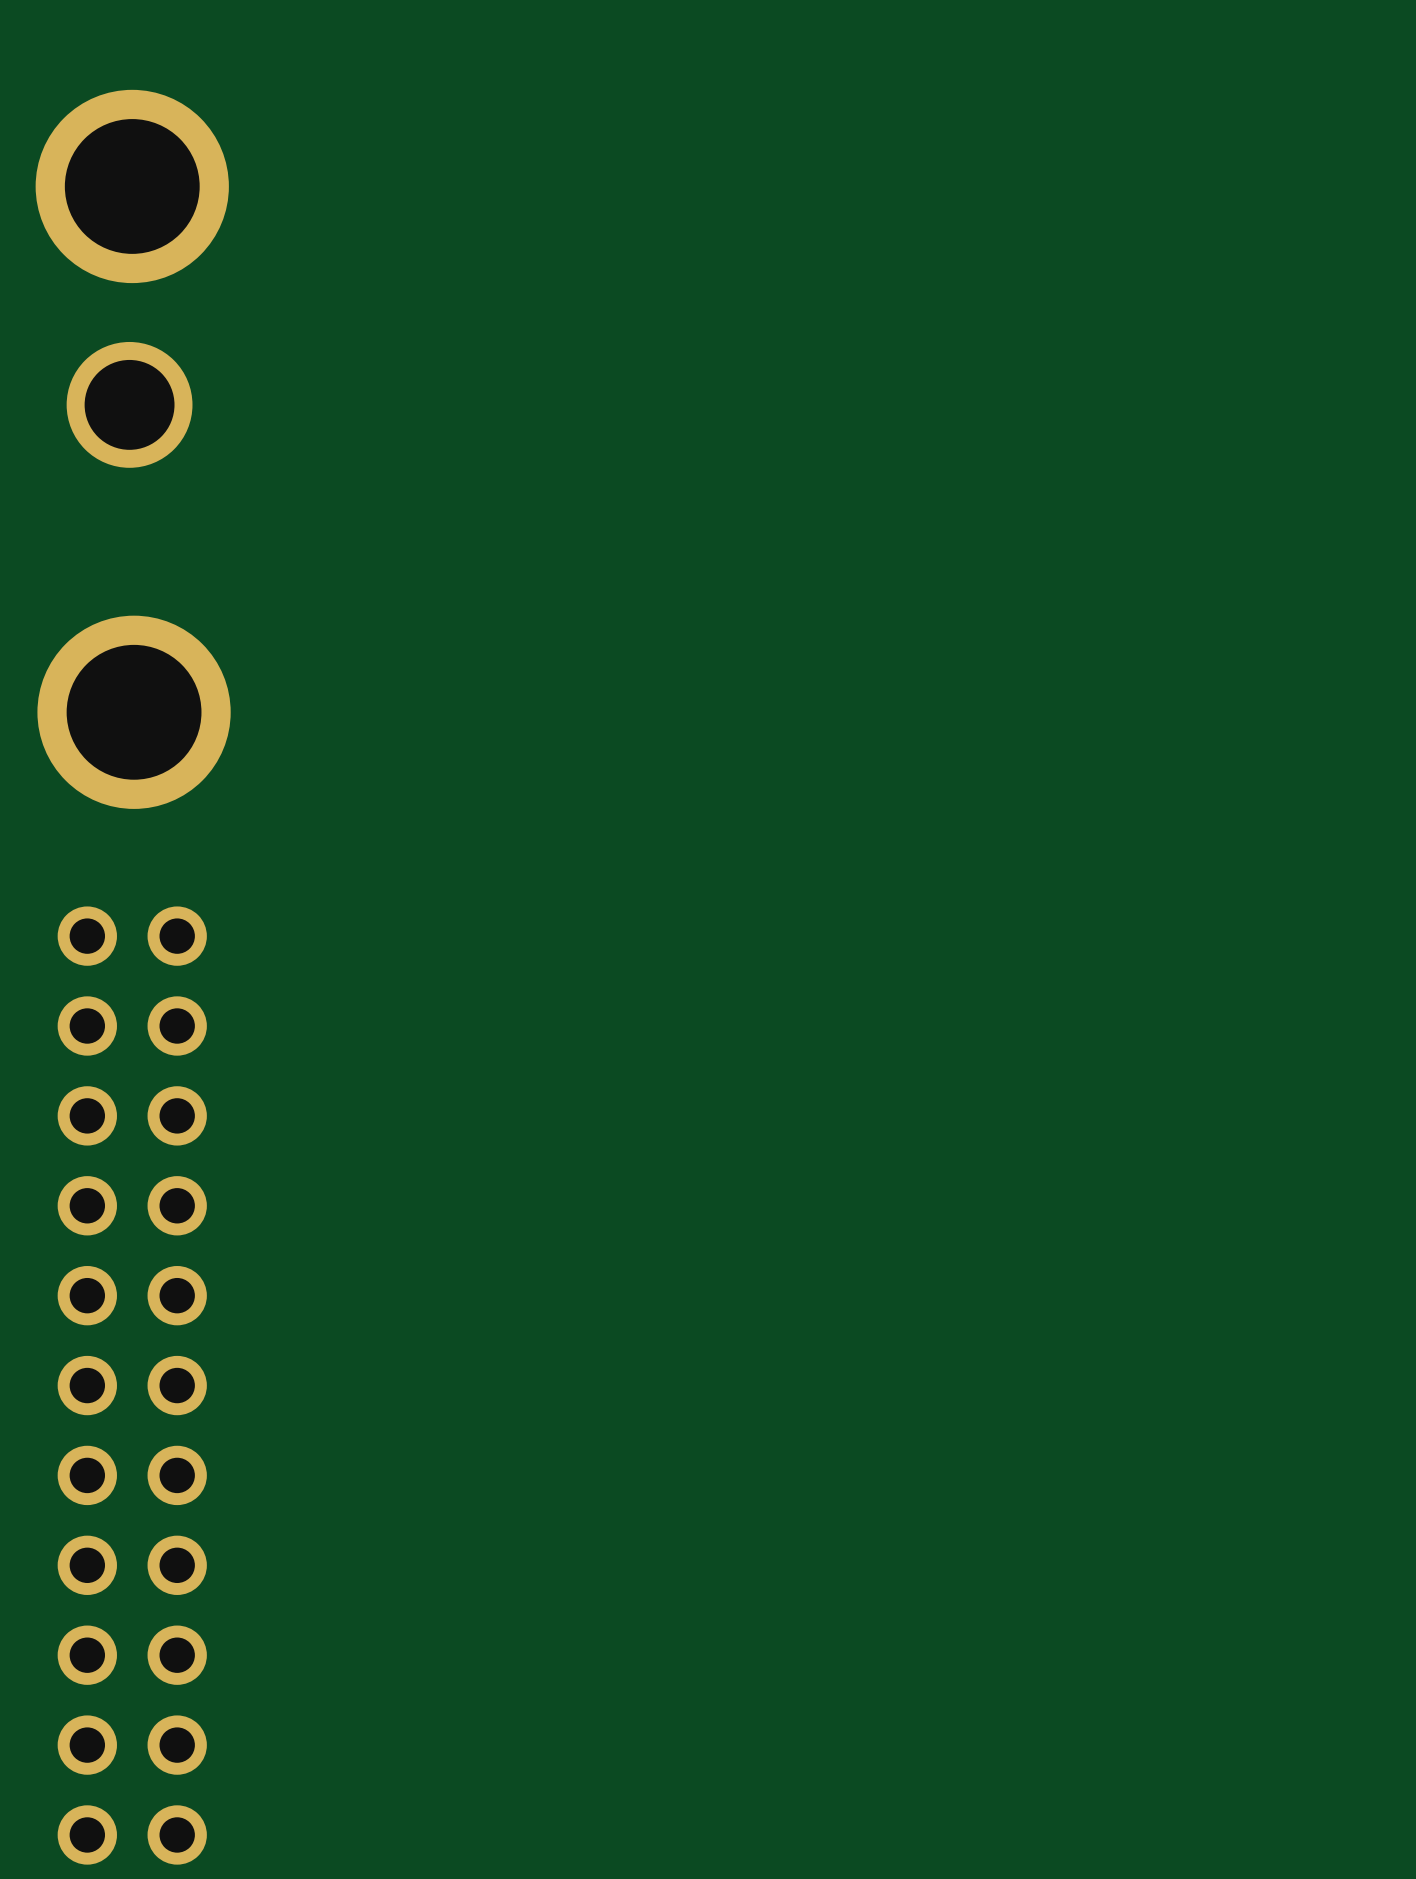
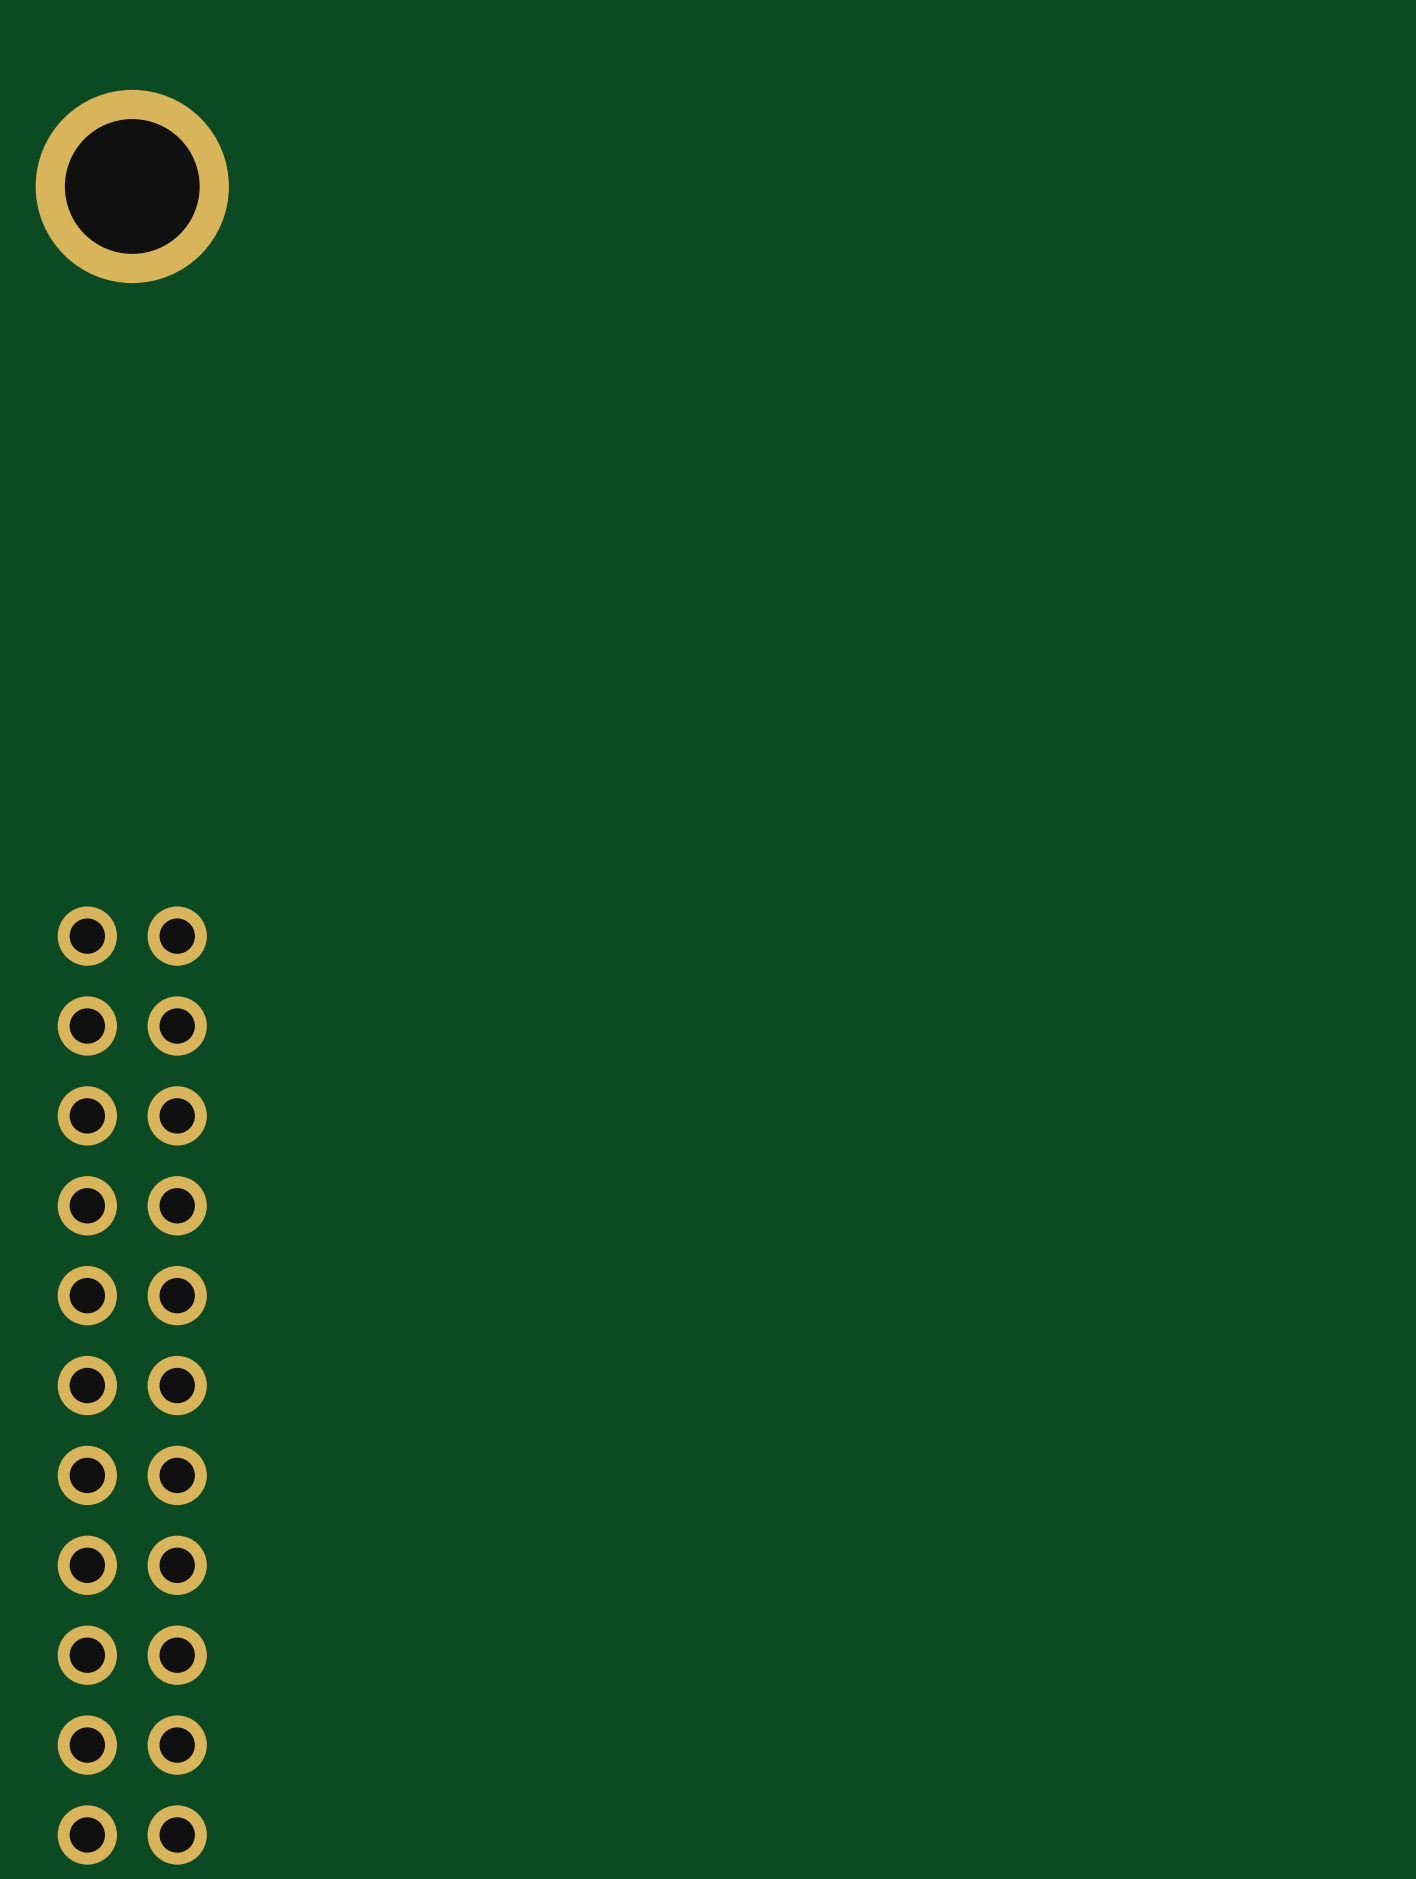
part: (129, 404) -> none
part: (134, 712) -> none

